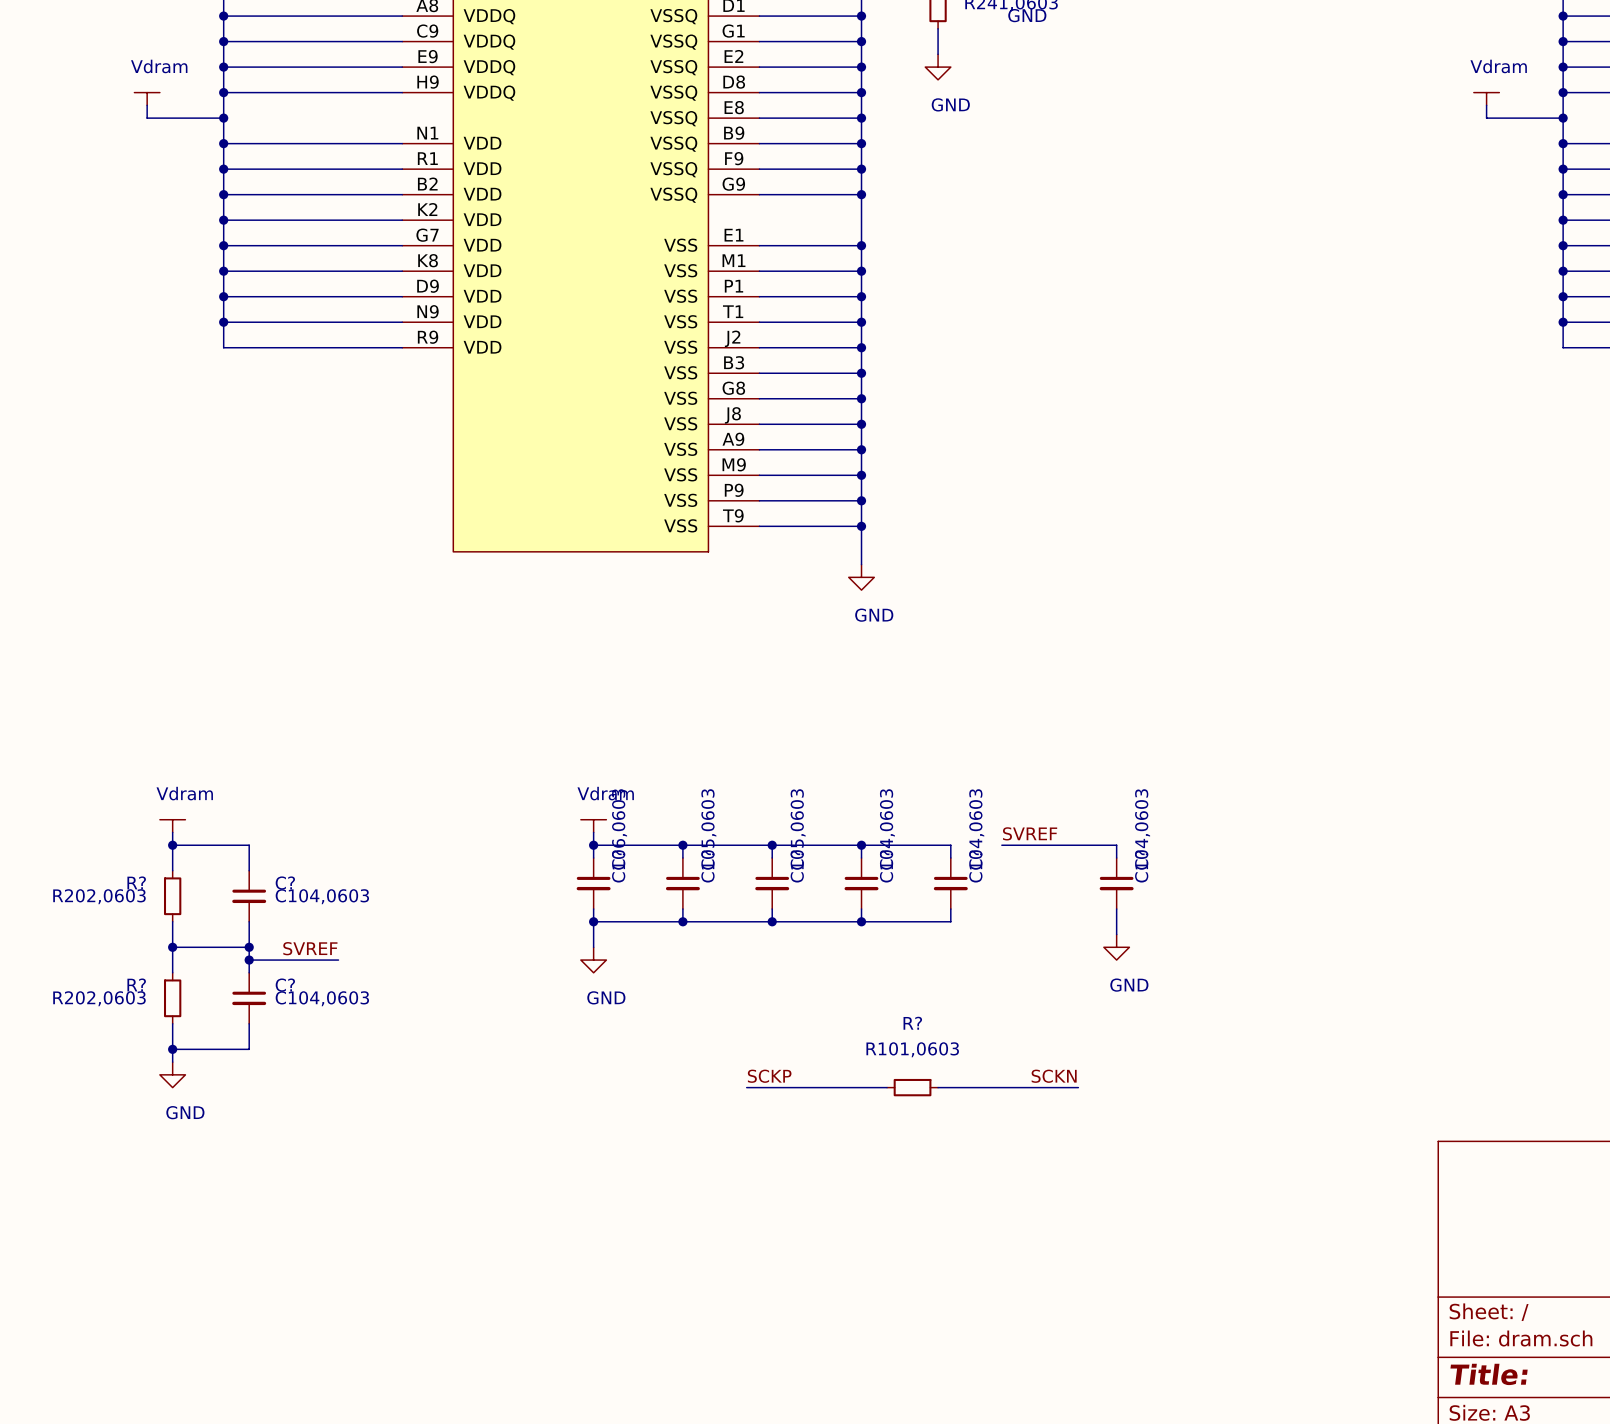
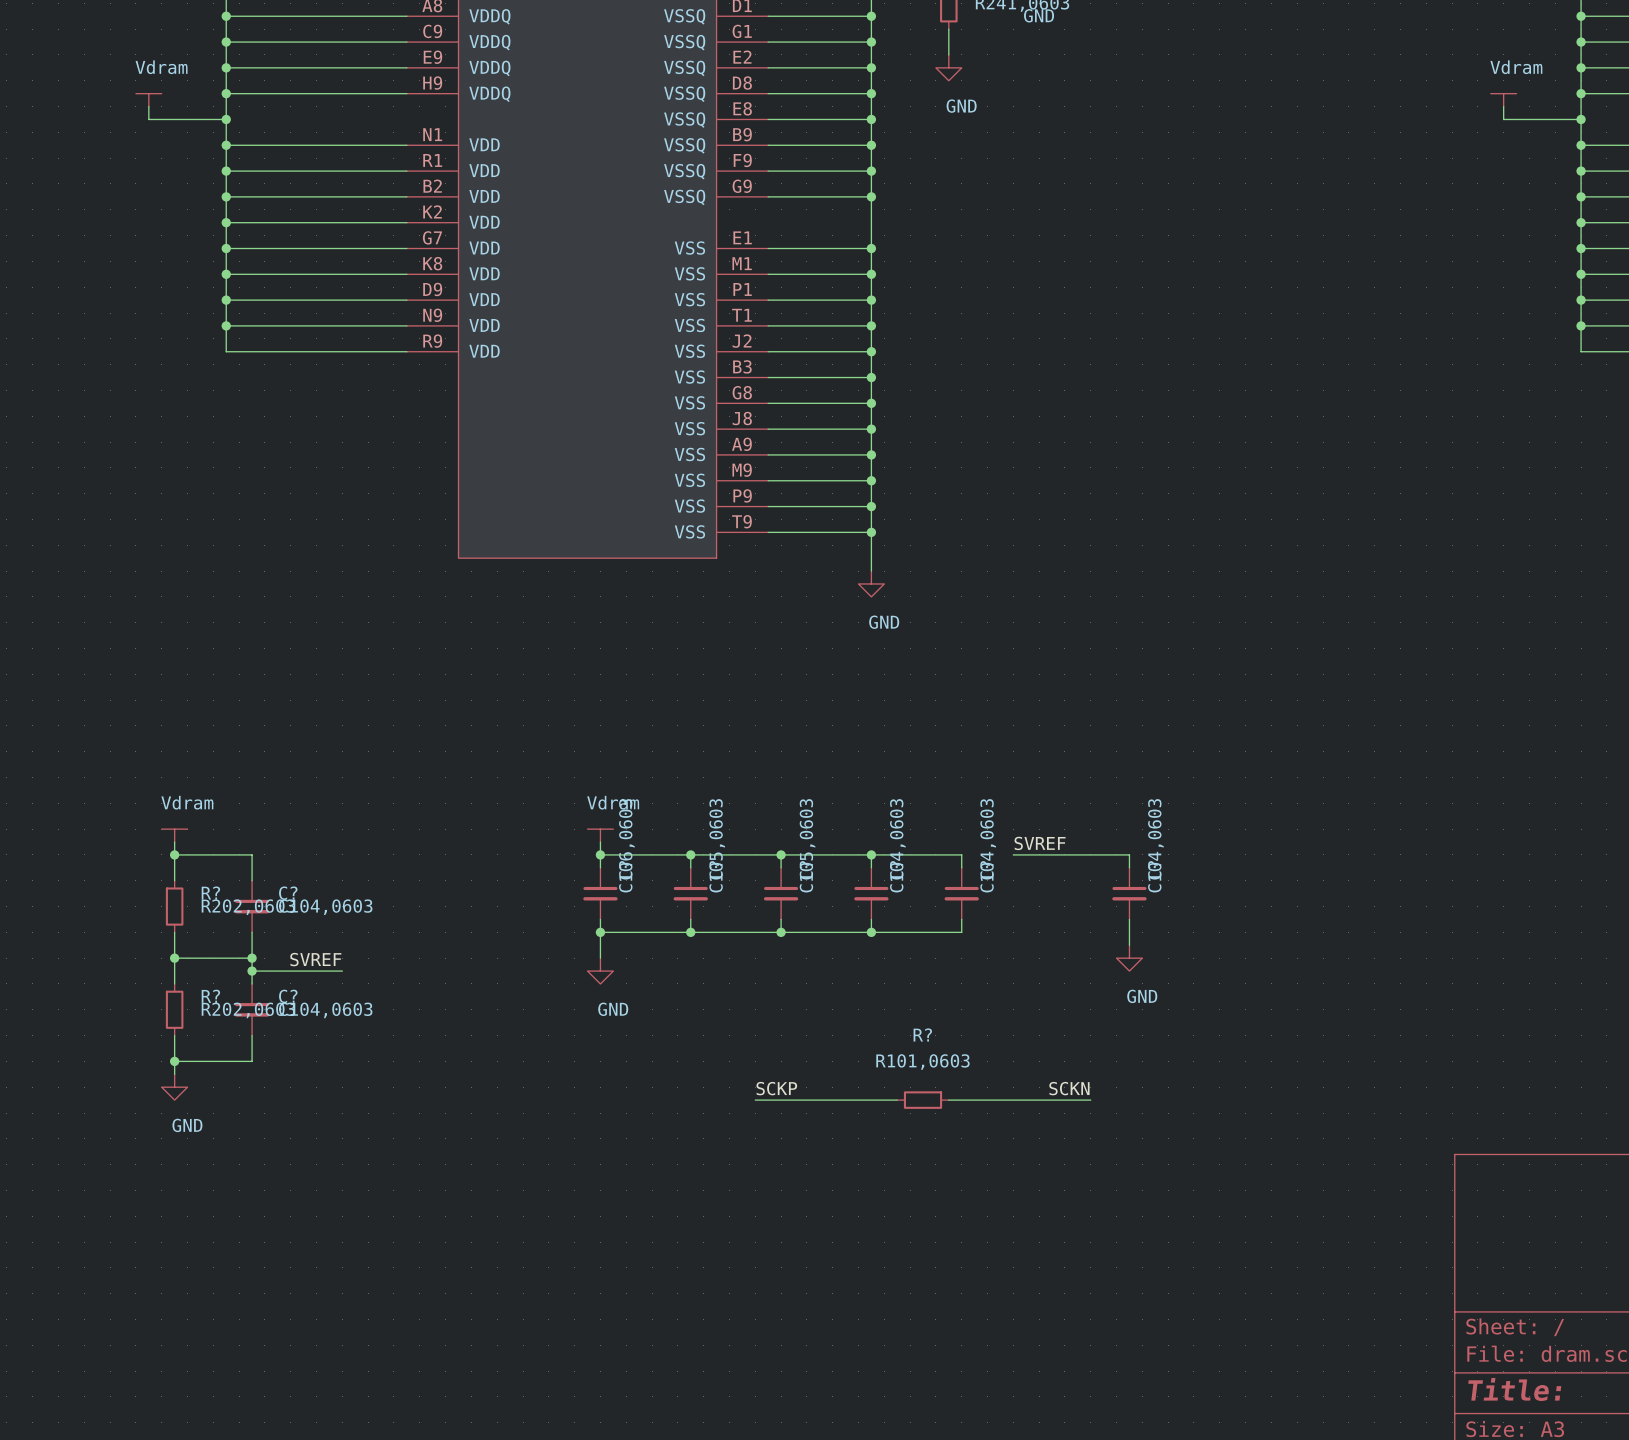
R? name position: R? (136, 882) -> R? (210, 893)
R? value position: R202,0603 (99, 896) -> R202,0603 (248, 907)
R? name position: R? (136, 984) -> R? (210, 996)
R? value position: R202,0603 (99, 998) -> R202,0603 (248, 1010)

